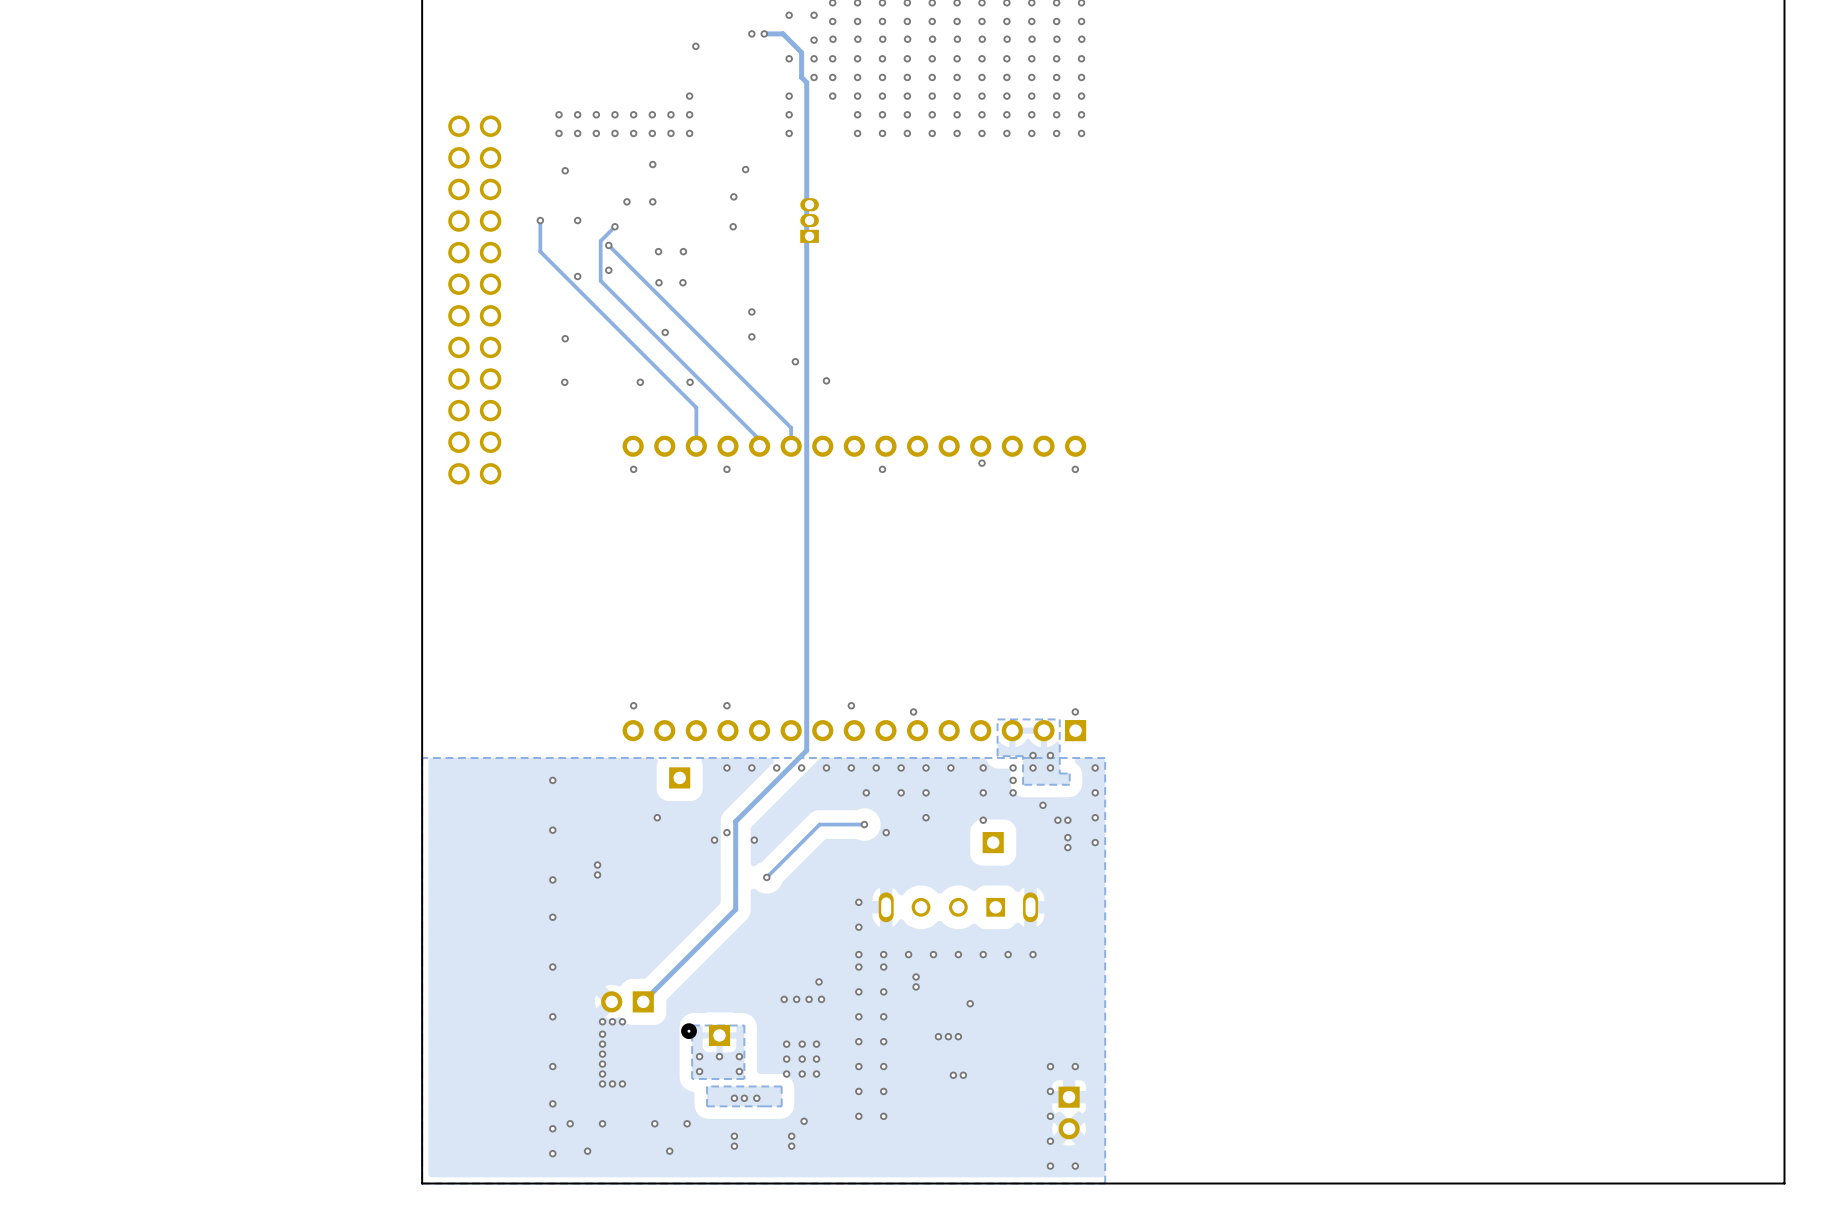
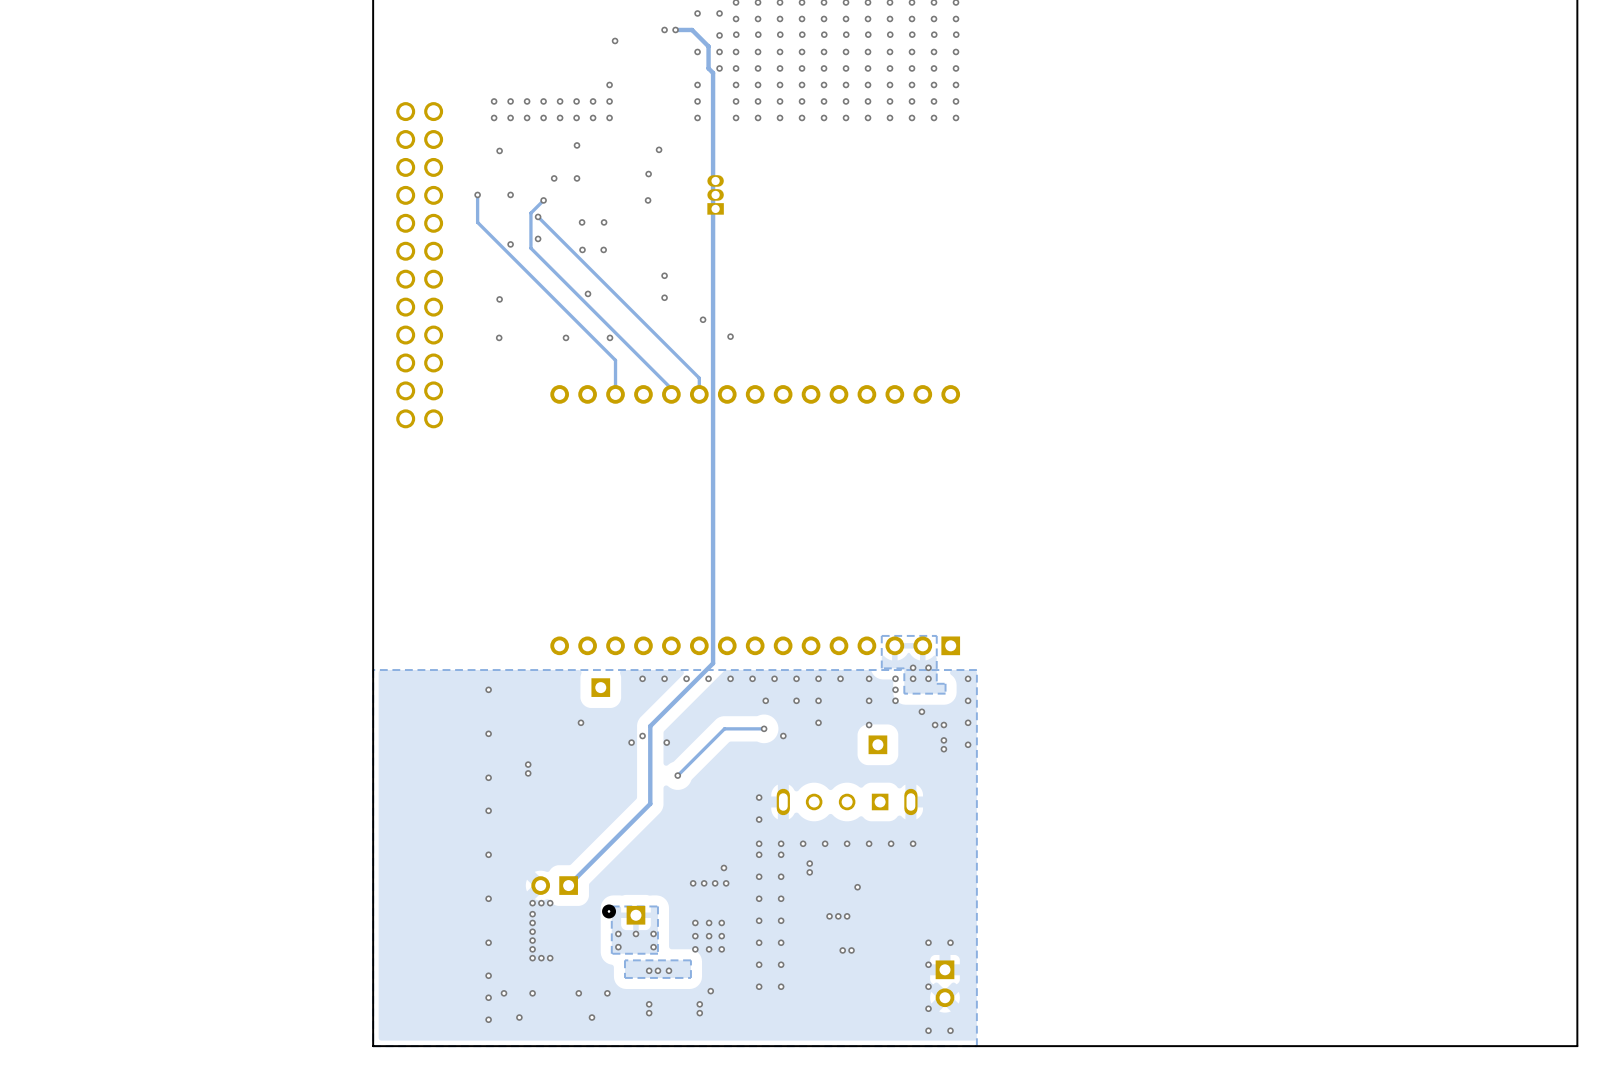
via: none -> (736, 101)
via: none -> (736, 117)
via: (982, 463) -> none
via: (633, 469) -> none
via: (726, 469) -> none
via: (882, 469) -> none
via: (1075, 469) -> none
via: (633, 705) -> none
via: (726, 705) -> none
via: (851, 705) -> none
via: (913, 711) -> none
via: (1075, 711) -> none

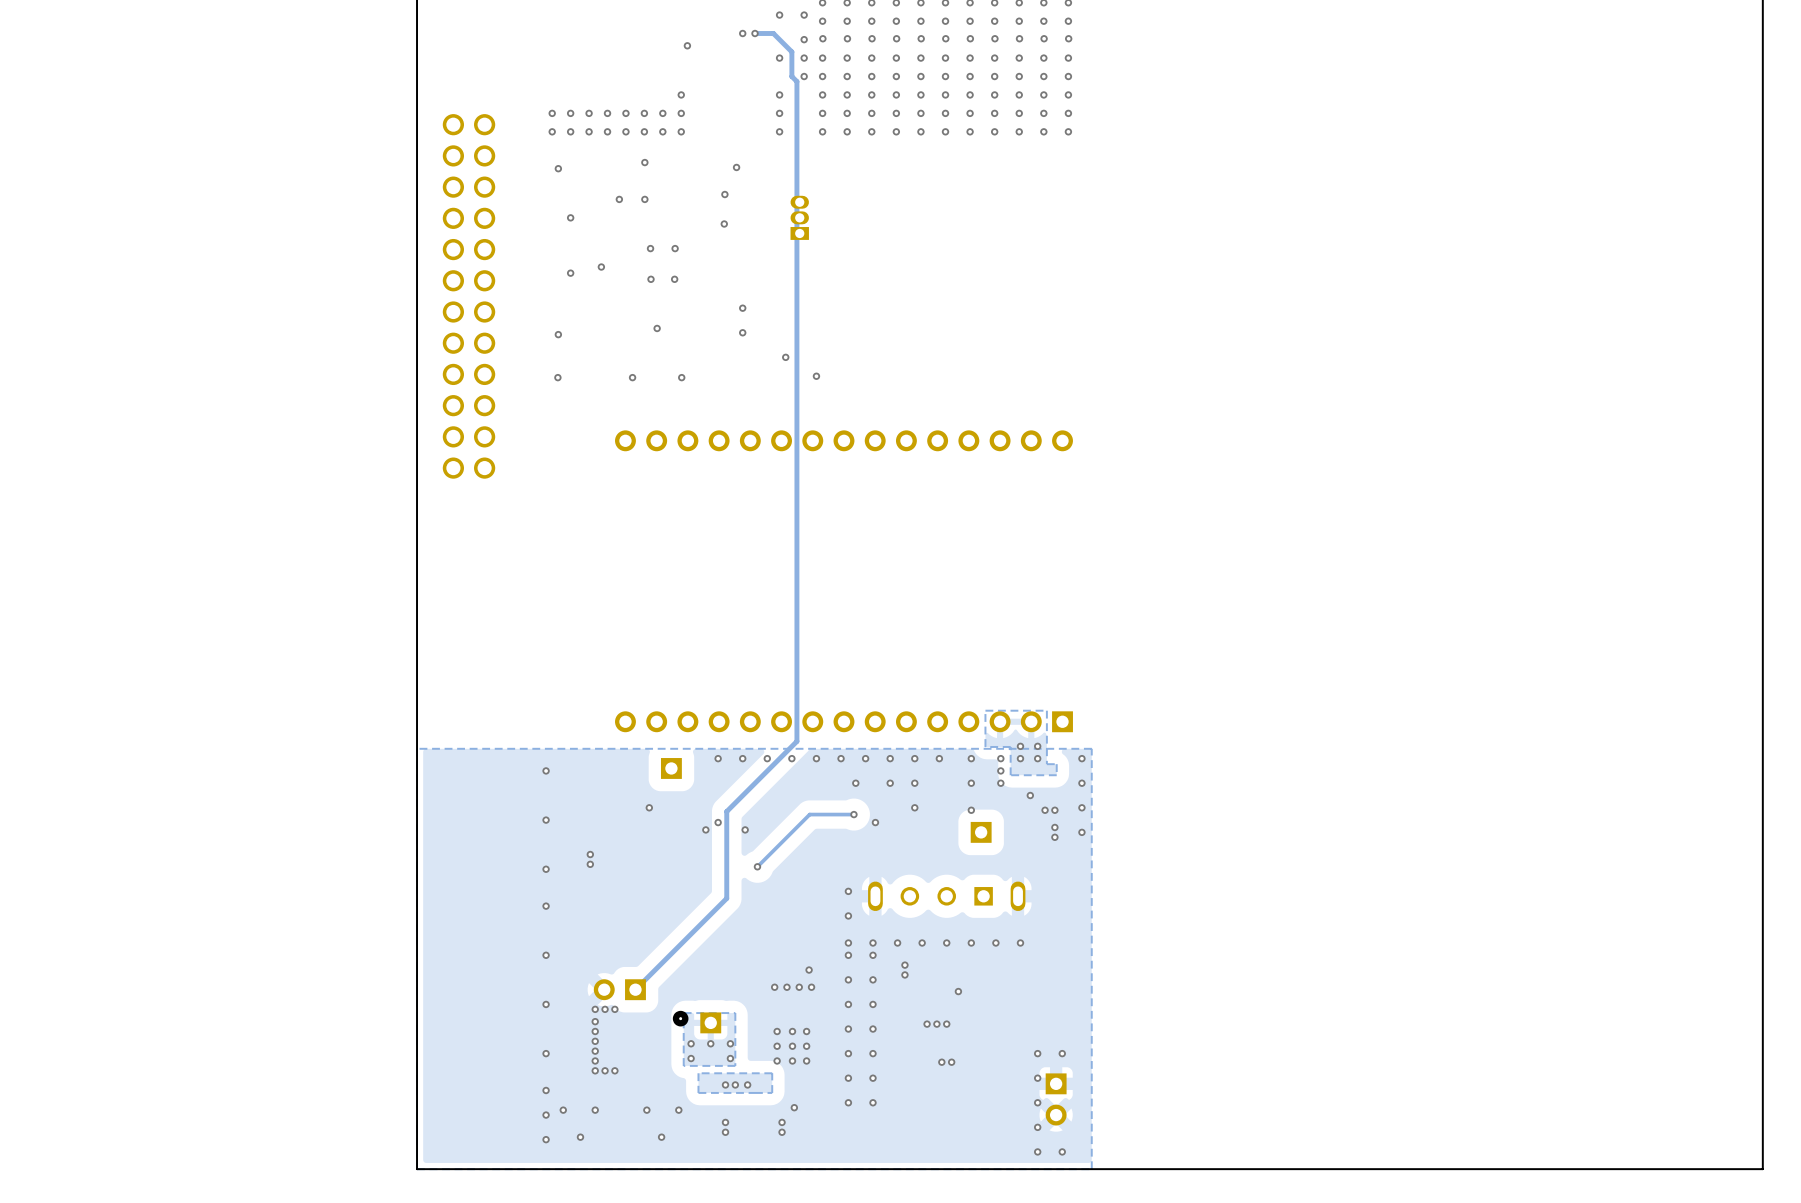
track: (477, 194) (477, 222) (615, 360) (615, 394) -> none
via: (477, 194) -> none
track: (543, 200) (530, 213) (530, 248) (671, 388) (671, 394) -> none
via: (543, 200) -> none
track: (538, 216) (699, 378) (699, 394) -> none
via: (538, 216) -> none

